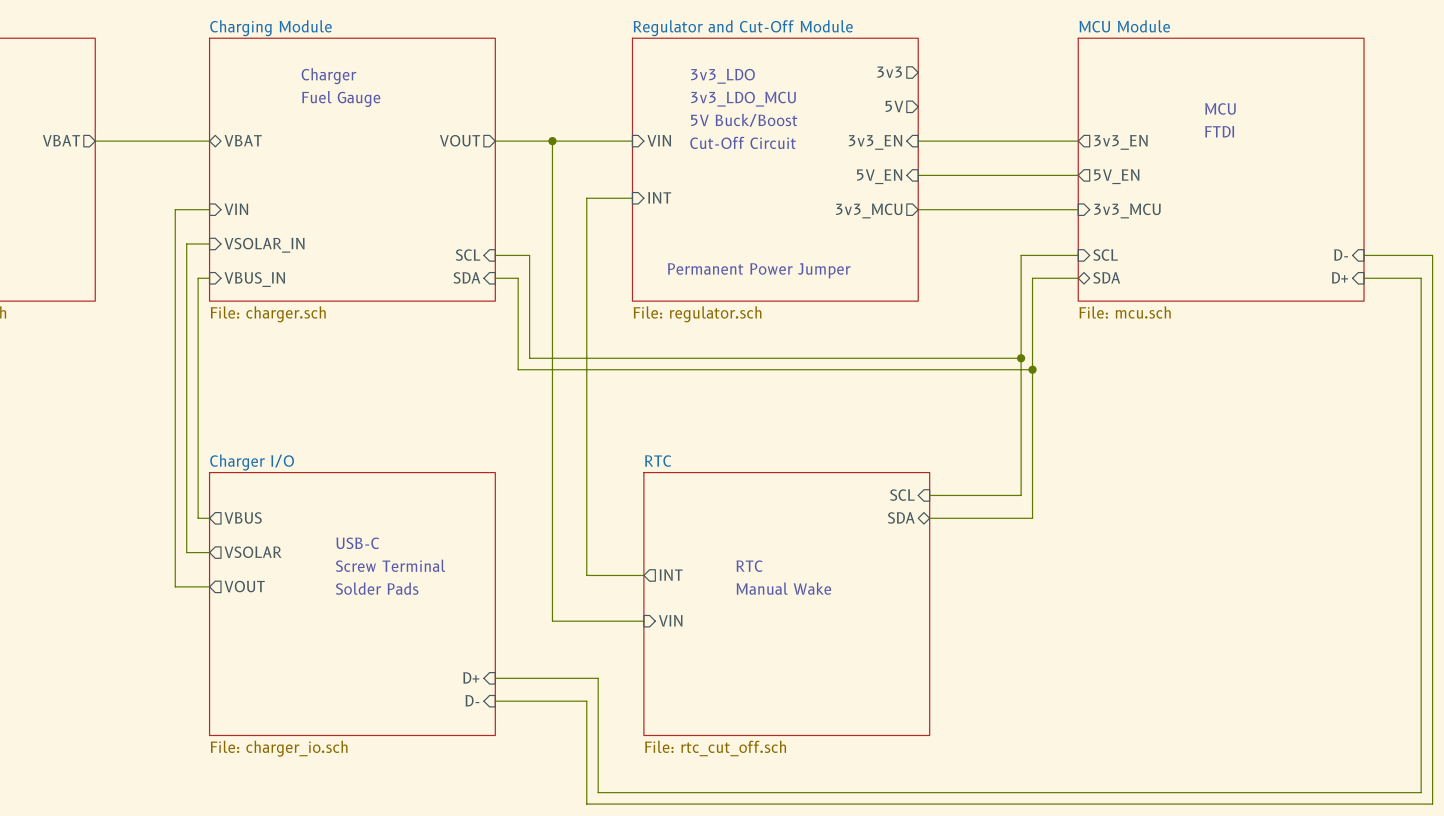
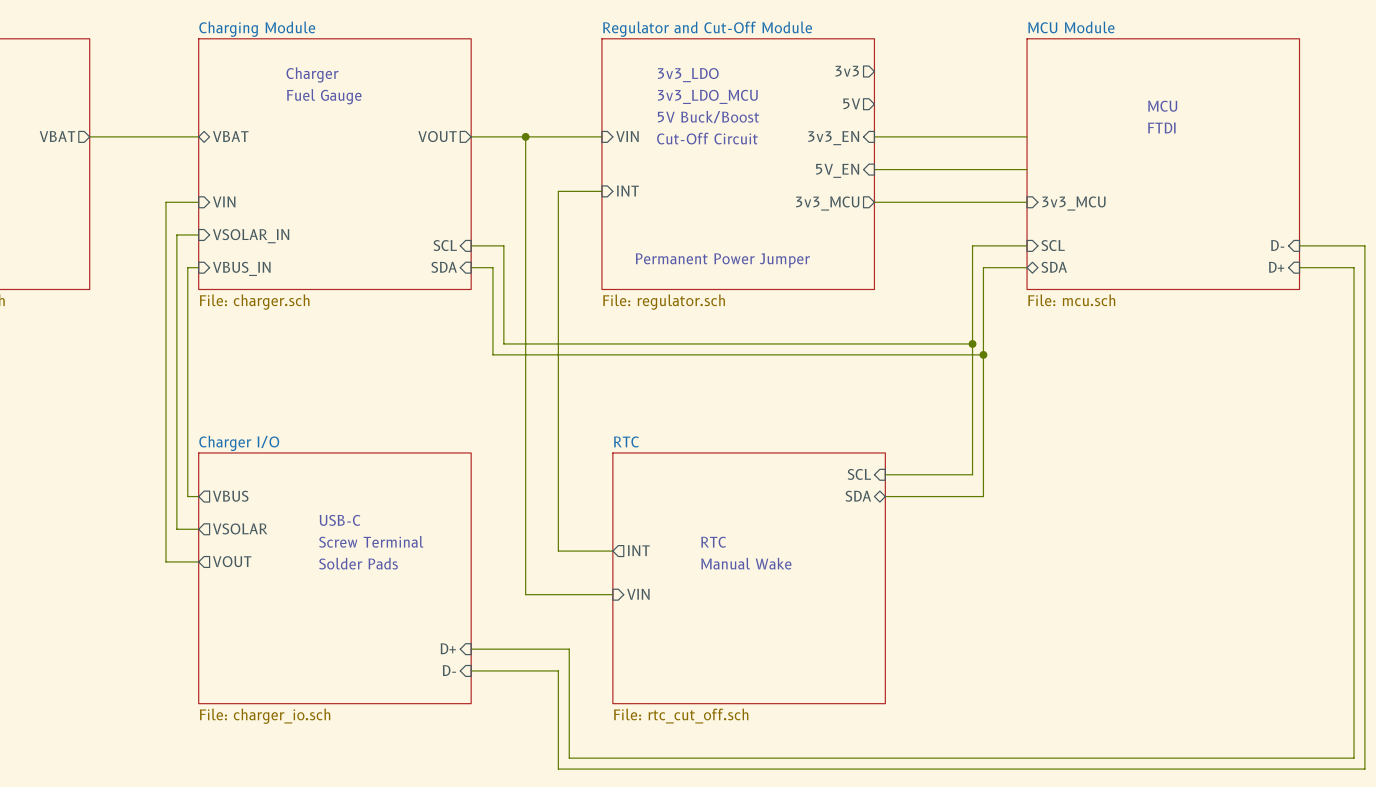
sheet pin: 3v3_EN (1120, 142) -> none
sheet pin: 5V_EN (1116, 176) -> none

